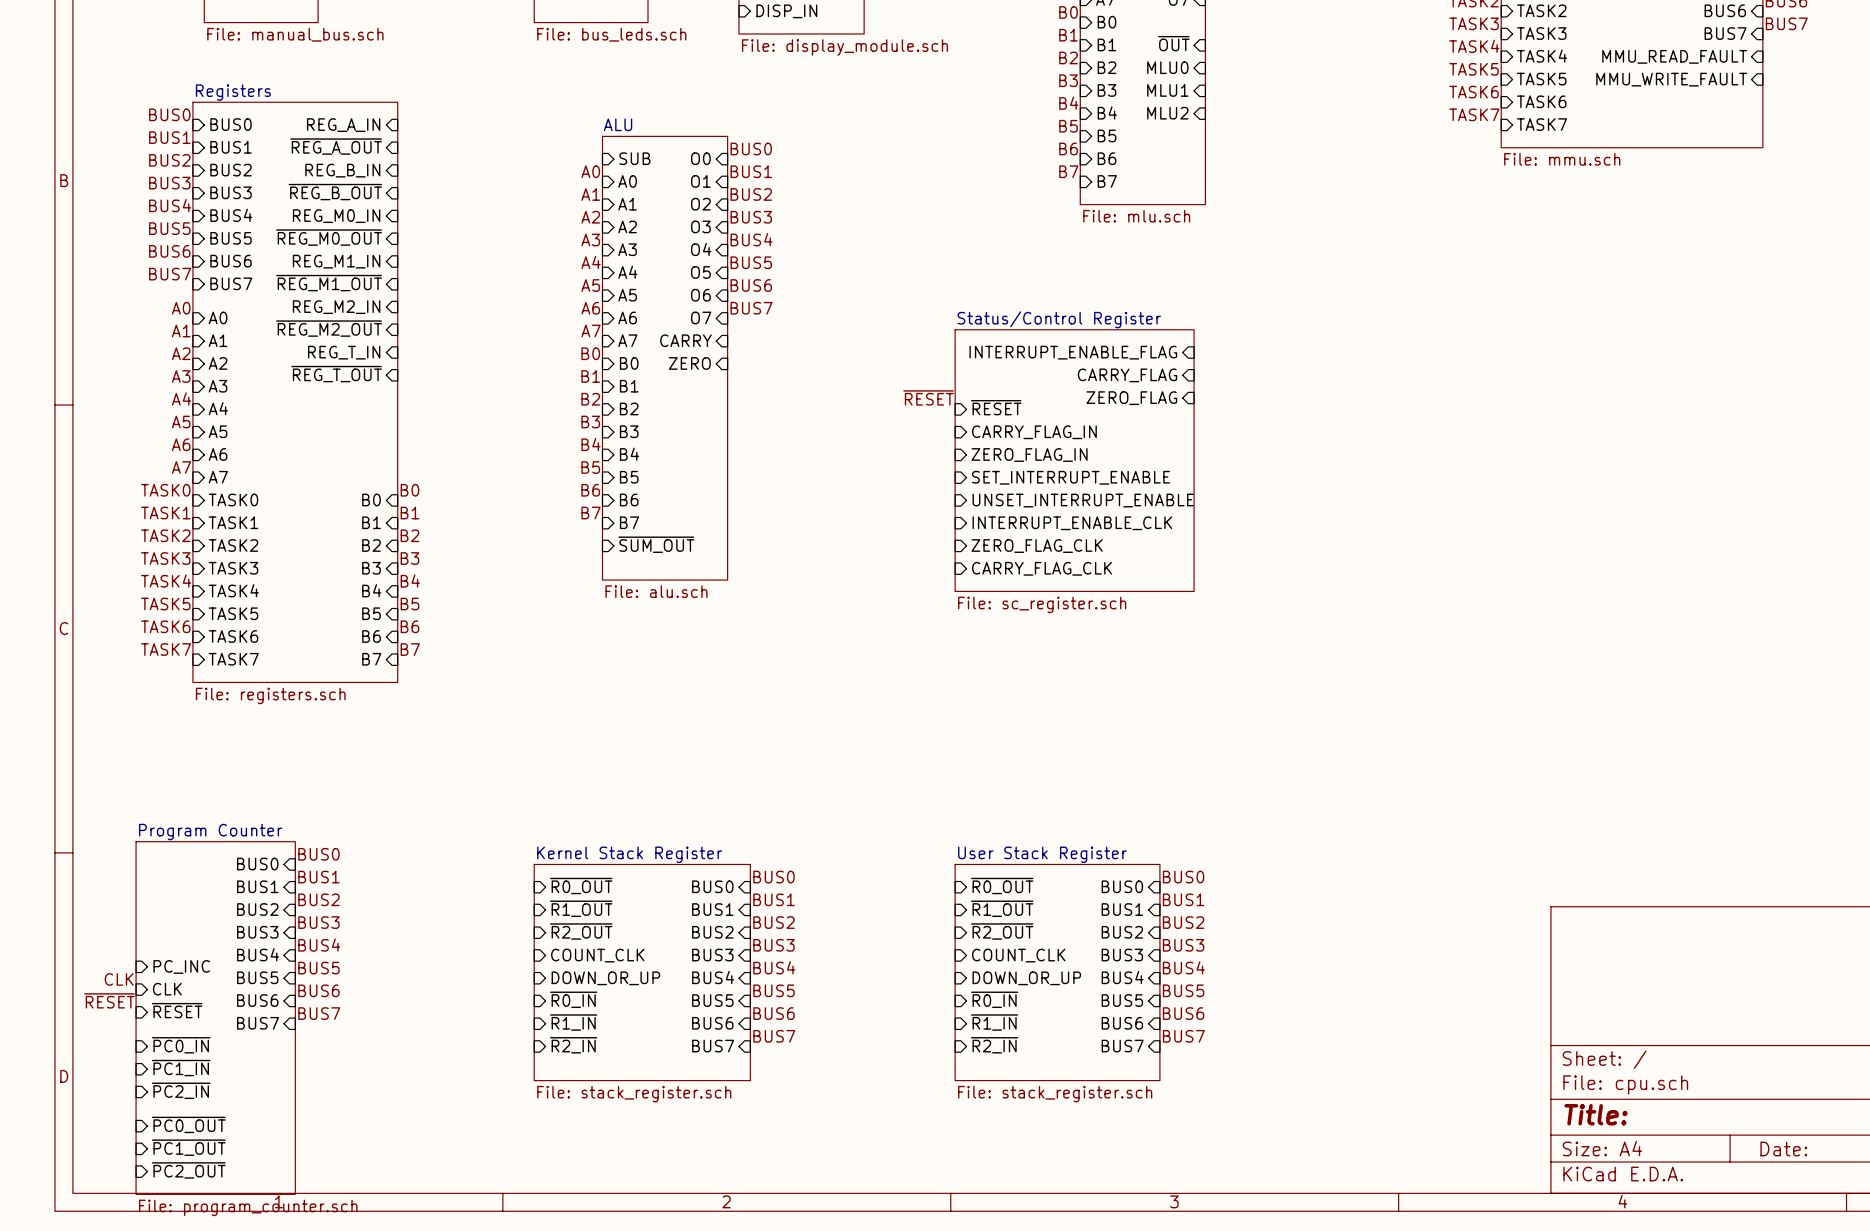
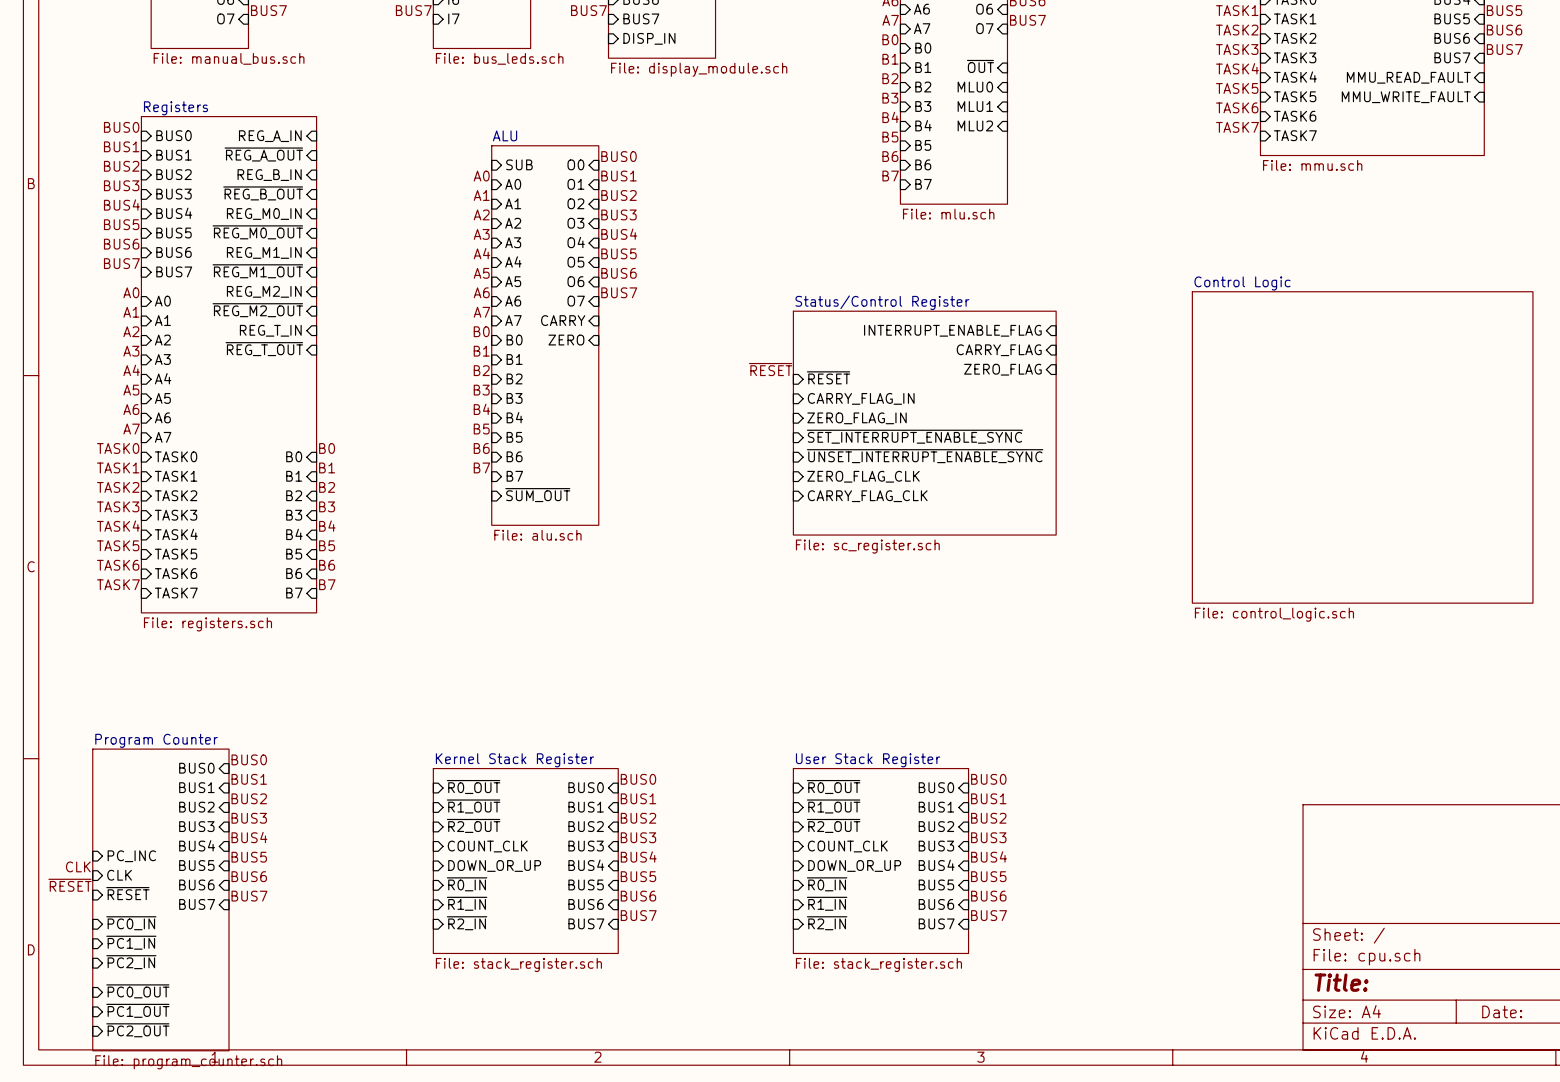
sheet pin position: INTERRUPT_ENABLE_FLAG (1073, 352) -> INTERRUPT_ENABLE_FLAG (952, 330)
sheet pin position: CARRY_FLAG (1127, 375) -> CARRY_FLAG (999, 350)
sheet pin position: ZERO_FLAG (1131, 398) -> ZERO_FLAG (1002, 369)
sheet Status/Control Register: File: sc_register.sch (1074, 460) -> none
sheet Status/Control Register: none -> File: sc_register.sch (924, 423)
sheet pin: SET_INTERRUPT_ENABLE (1070, 477) -> ~{SET_INTERRUPT_ENABLE_SYNC} (914, 436)
sheet Control Logic: none -> File: control_logic.sch (1362, 447)
sheet pin: UNSET_INTERRUPT_ENABLE (1083, 500) -> ~{UNSET_INTERRUPT_ENABLE_SYNC} (925, 456)
sheet pin: INTERRUPT_ENABLE_CLK (1072, 523) -> ZERO_FLAG_CLK (863, 476)
sheet pin: ZERO_FLAG_CLK (1037, 546) -> CARRY_FLAG_CLK (867, 496)
sheet pin: CARRY_FLAG_CLK (1042, 568) -> none

